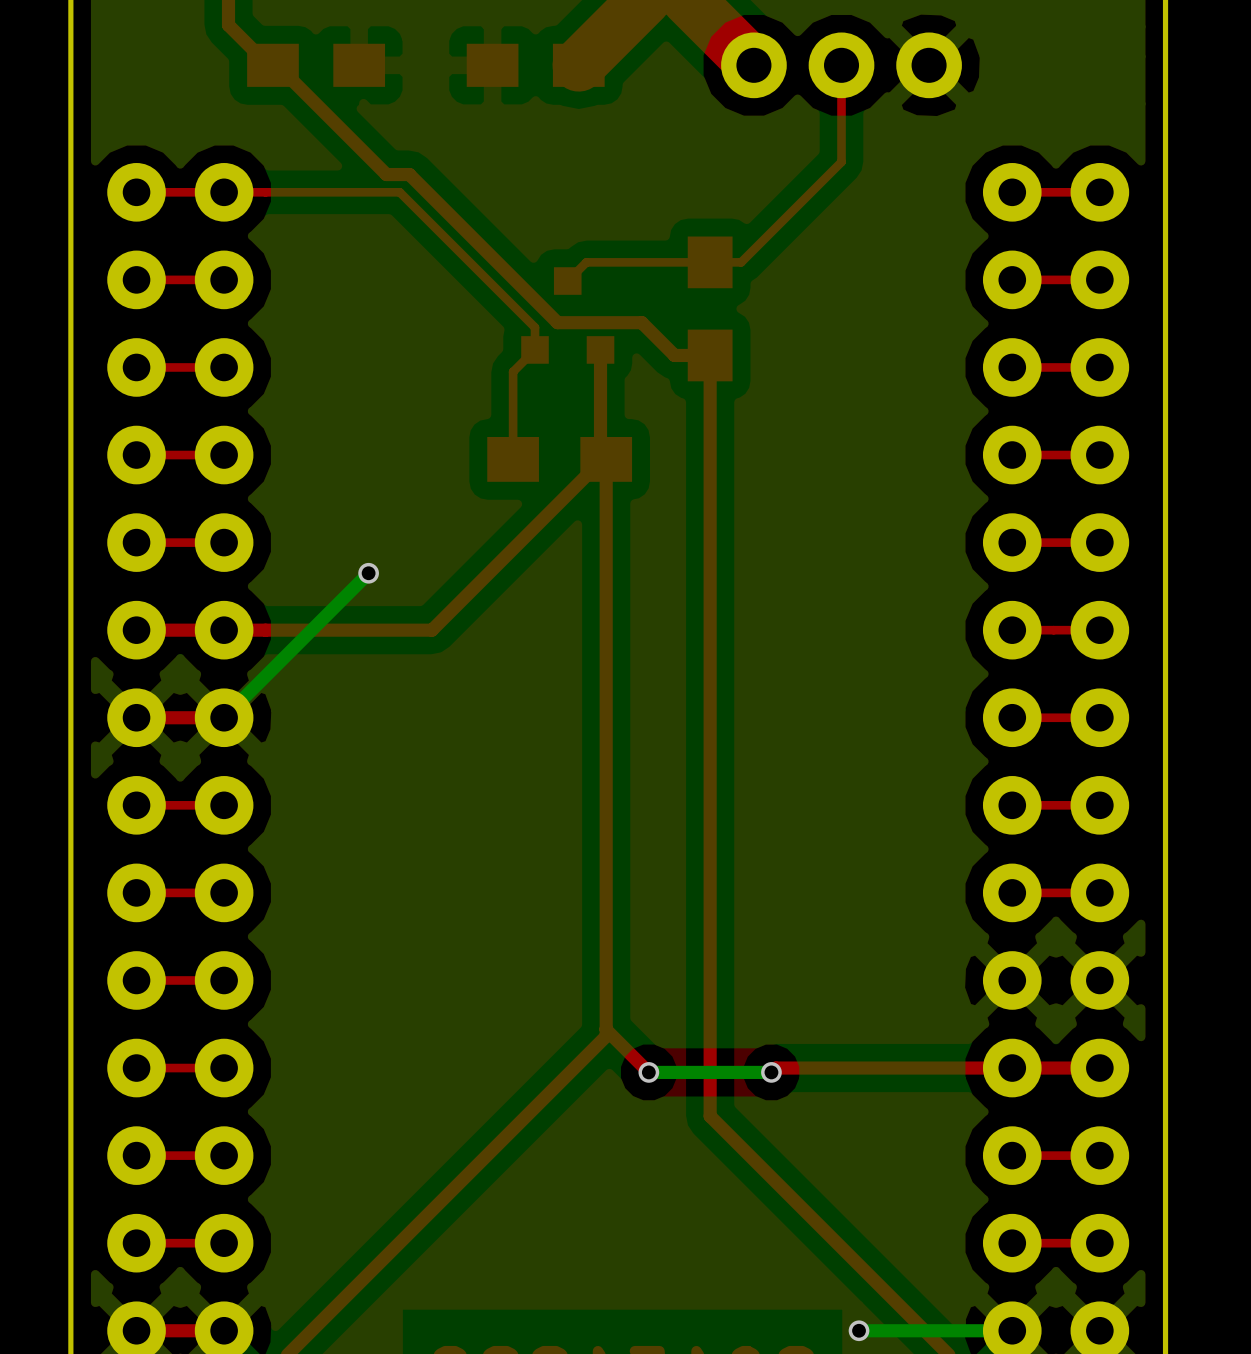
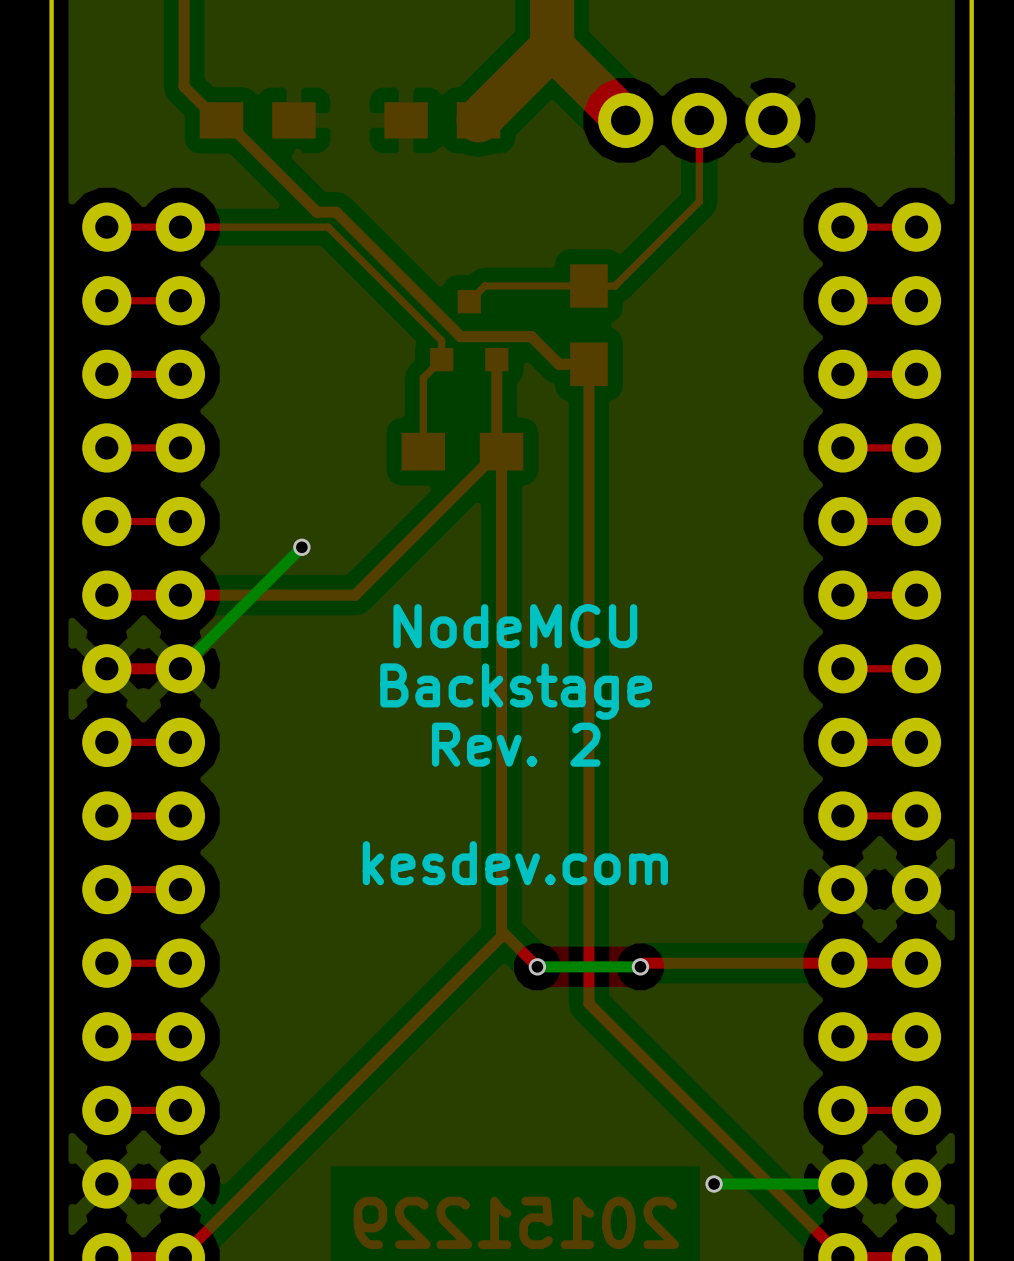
text: none -> NodeMCU (515, 626)
text: none -> Backstage (516, 691)
text: none -> Rev. 2 (516, 744)
text: none -> kesdev.com (515, 863)

